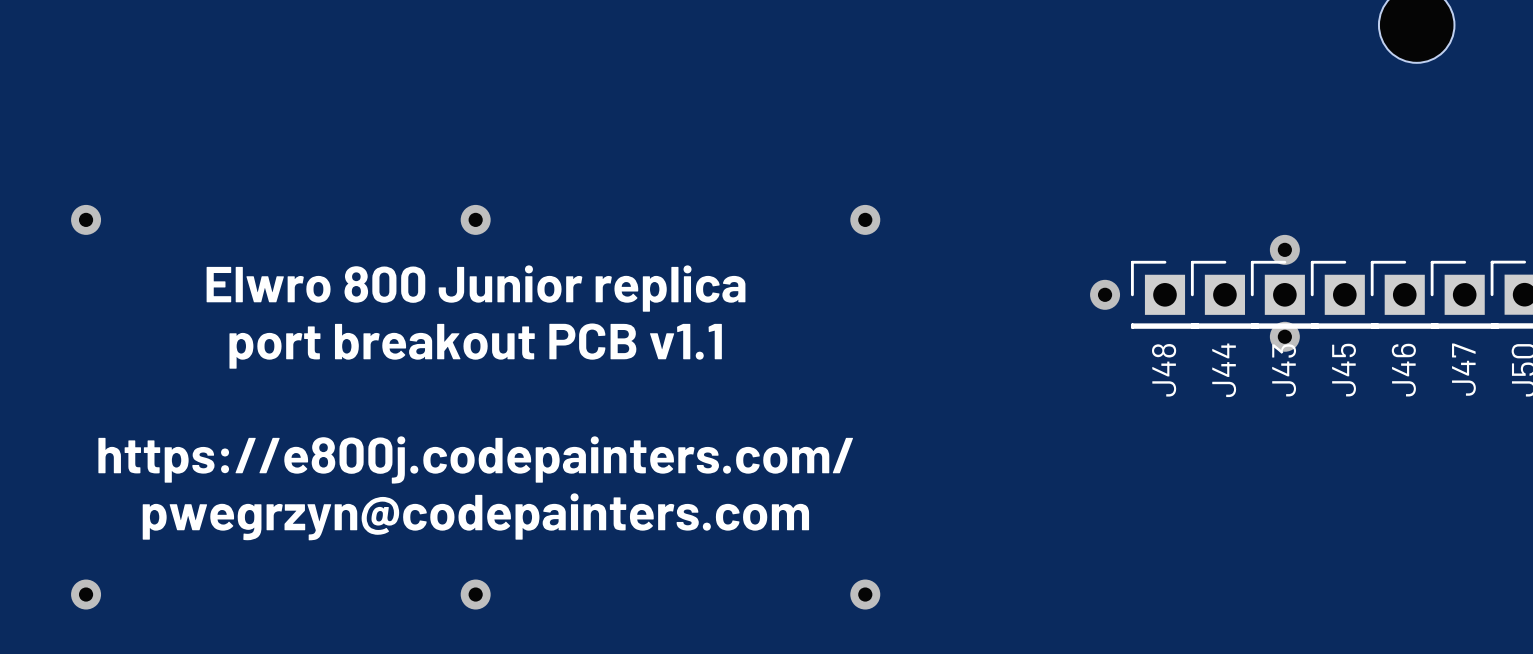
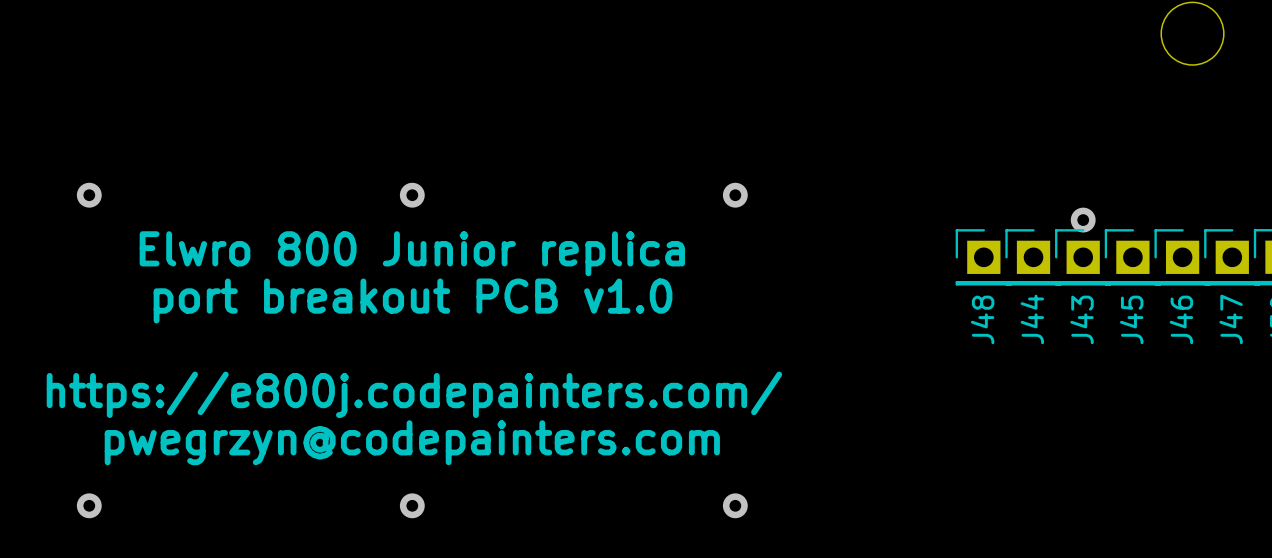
via: (1105, 294) -> none
via: (1284, 336) -> none
text: port breakout PCB v1.1 (475, 346) -> port breakout PCB v1.0 (413, 300)

